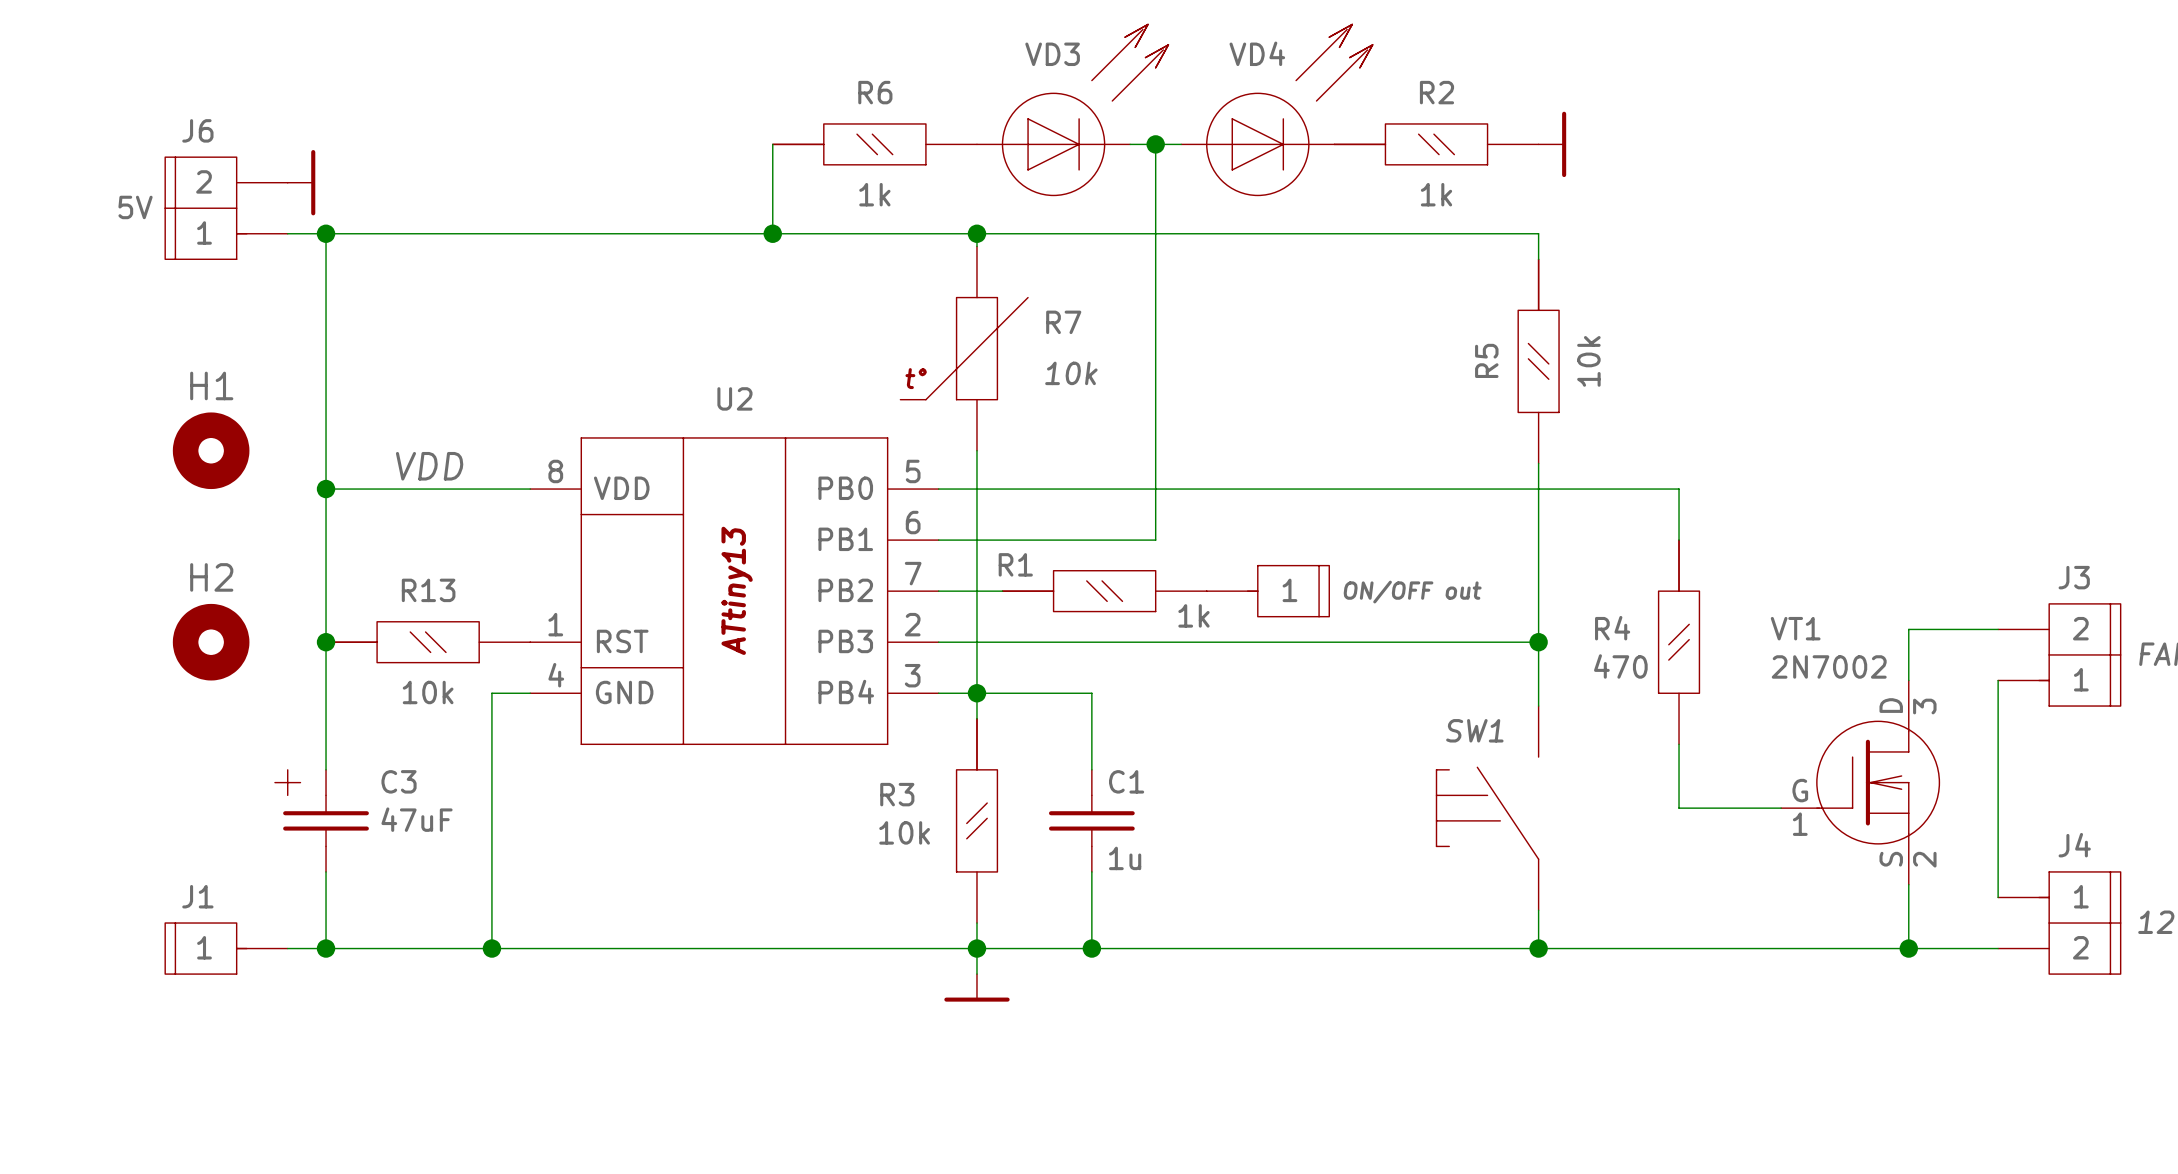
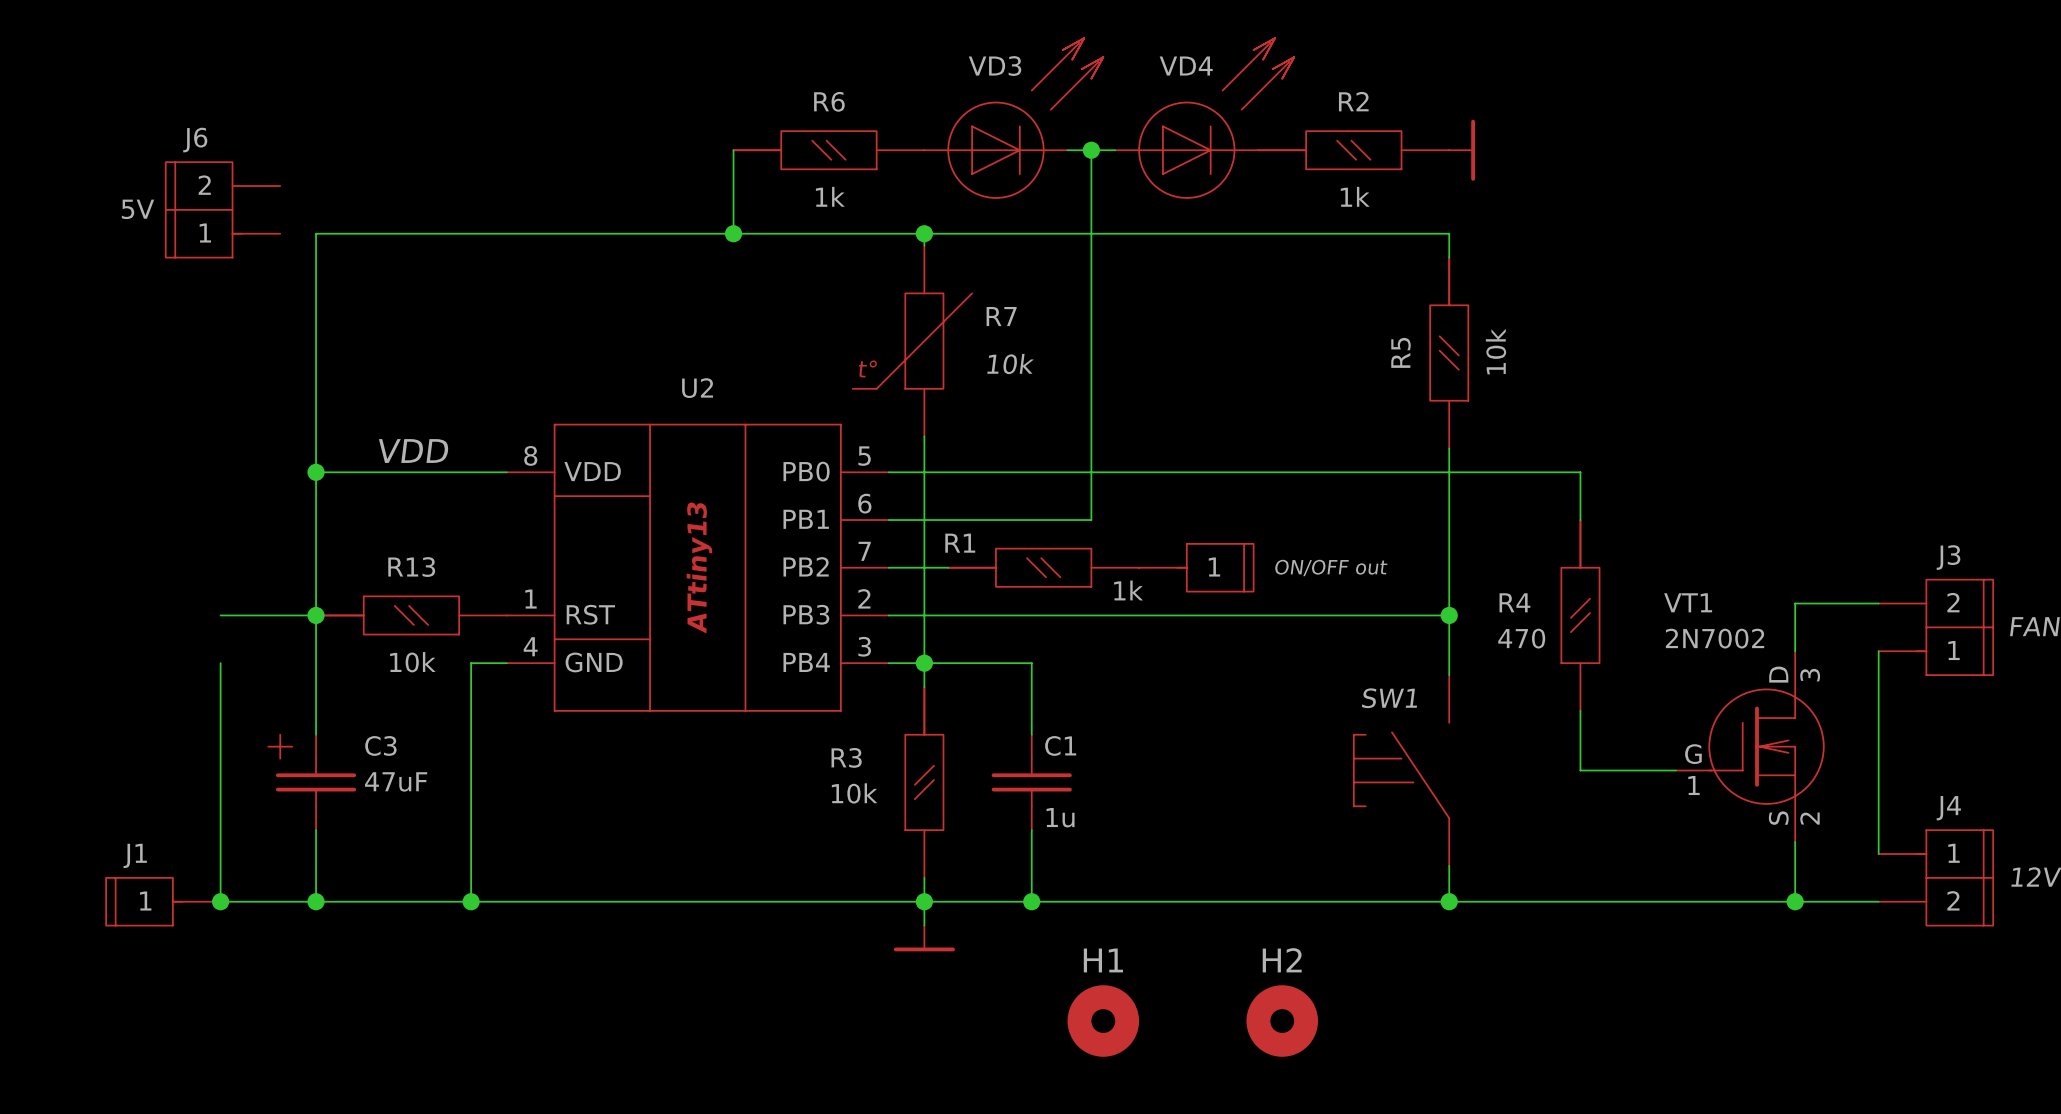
power symbol: (301, 182) -> none
wire: (287, 233) (326, 233) -> none
junction: (326, 233) -> none
H1 position: (211, 450) -> (1103, 1021)
H2 position: (211, 642) -> (1282, 1021)
wire: none -> (220, 615) (316, 615)
wire: none -> (220, 663) (220, 901) (280, 901)
junction: none -> (220, 901)
J1 position: (226, 948) -> (163, 901)

